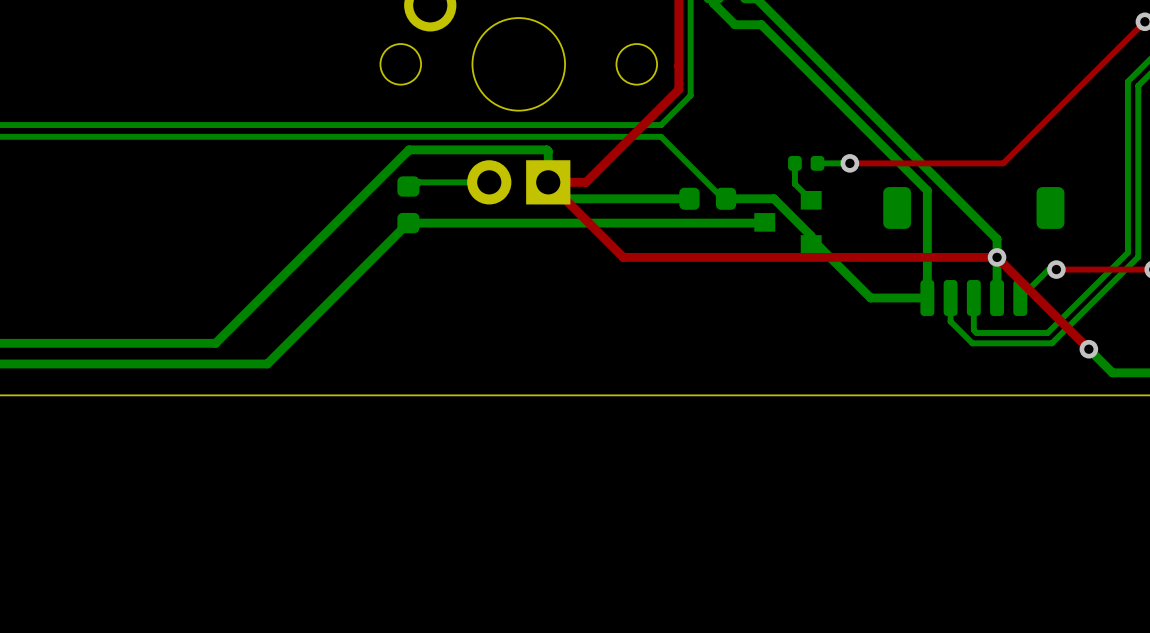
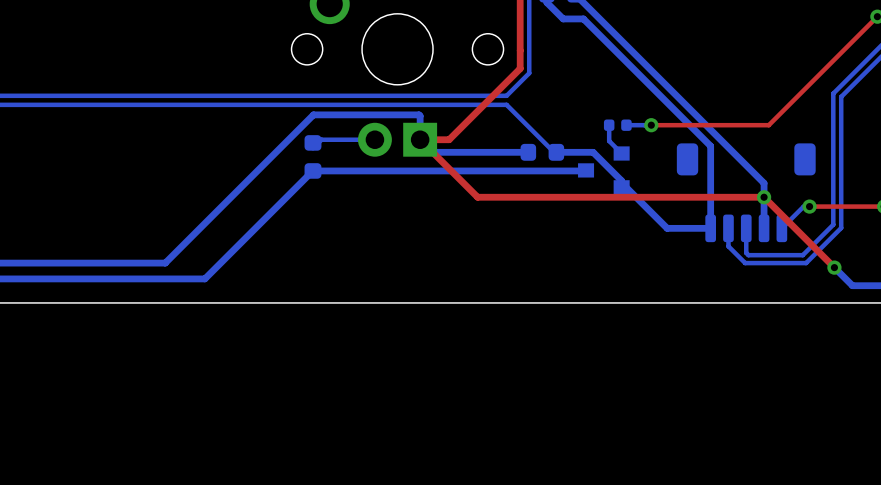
bottom track: (1127, 81) (1127, 252) (1087, 293) -> (864, 62) (833, 93) (833, 224)
bottom track: (1138, 85) (1138, 256) (1097, 297) -> (872, 65) (841, 96) (841, 227)

